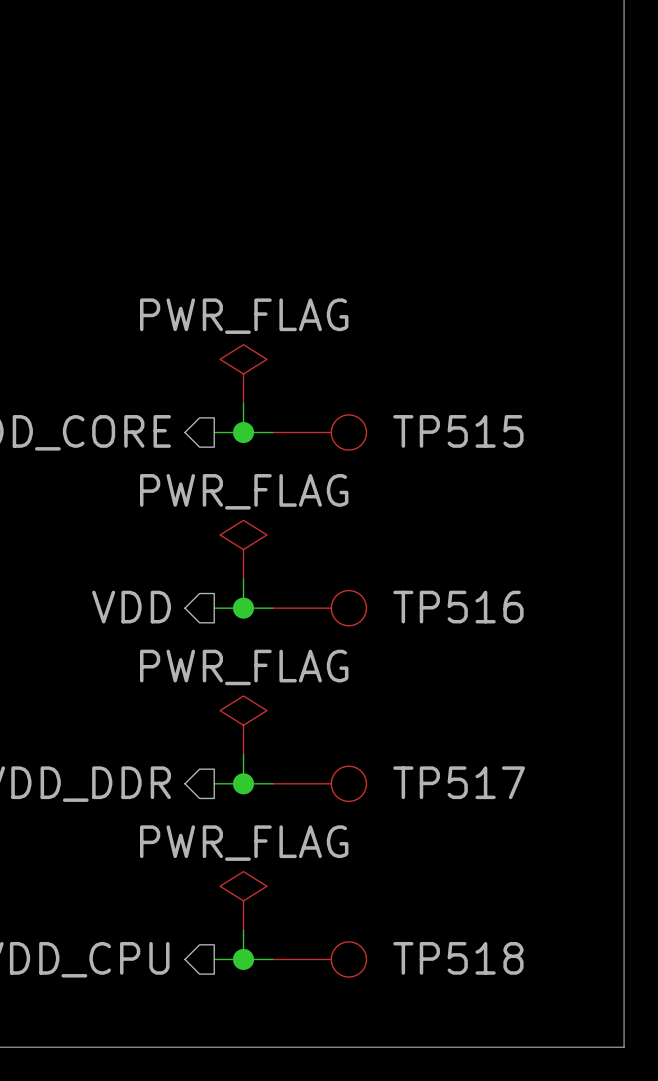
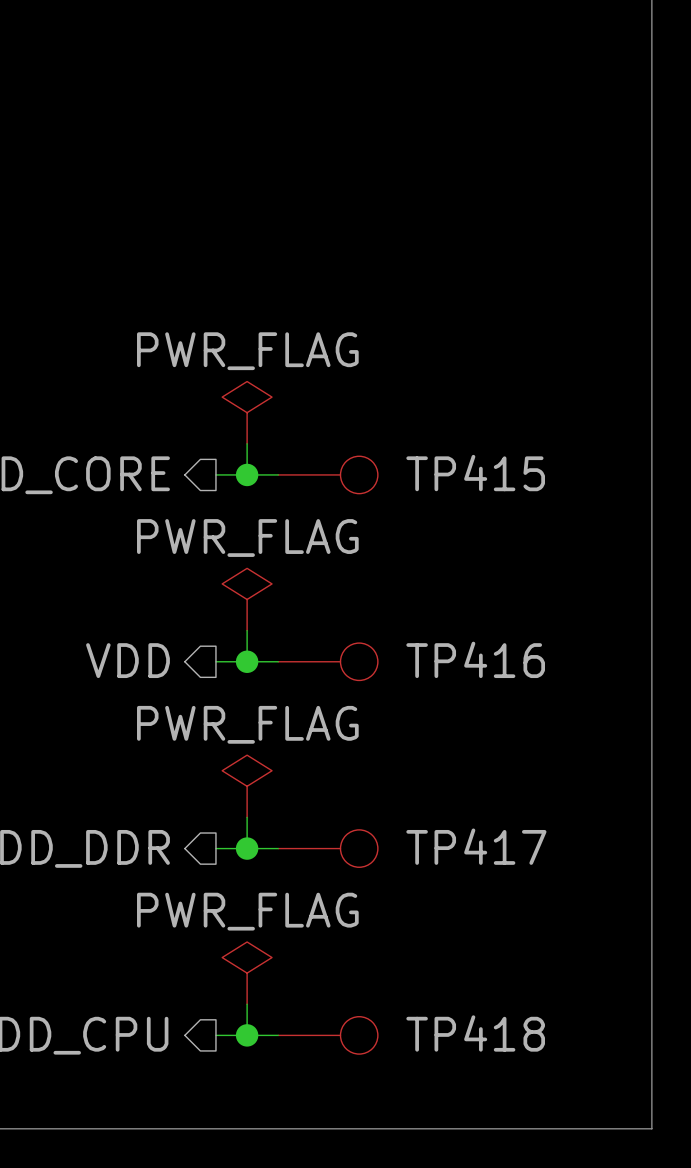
TP515 name: TP515 (458, 431) -> TP415 (475, 473)
TP516 name: TP516 (458, 607) -> TP416 (475, 659)
TP517 name: TP517 (459, 782) -> TP417 (476, 846)
TP518 name: TP518 (458, 958) -> TP418 (475, 1033)

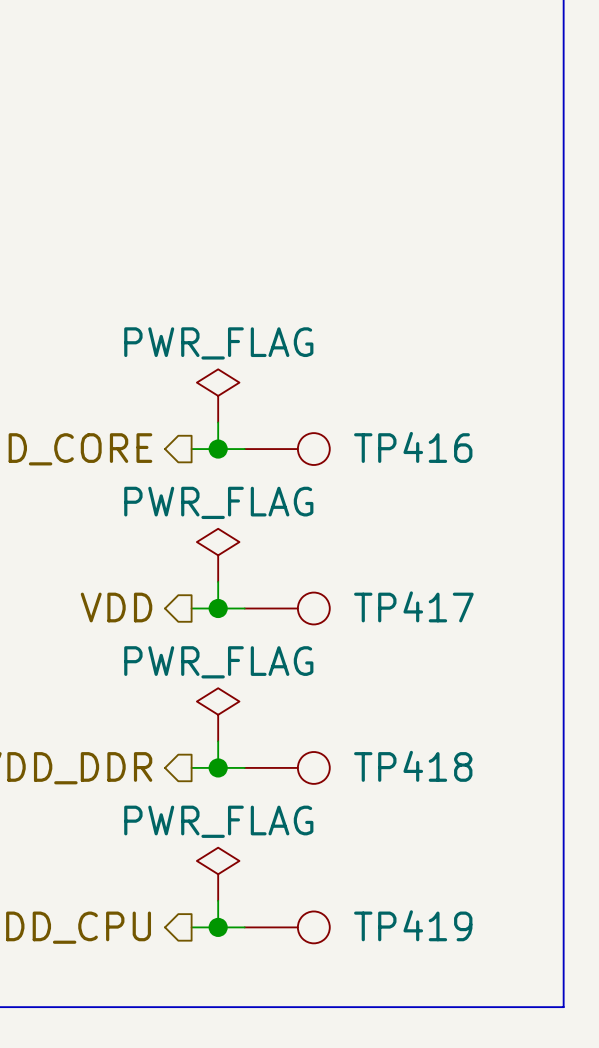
TP415 name: TP415 (475, 473) -> TP416 (413, 447)
TP416 name: TP416 (475, 659) -> TP417 (413, 606)
TP417 name: TP417 (476, 846) -> TP418 (413, 766)
TP418 name: TP418 (475, 1033) -> TP419 (413, 925)

